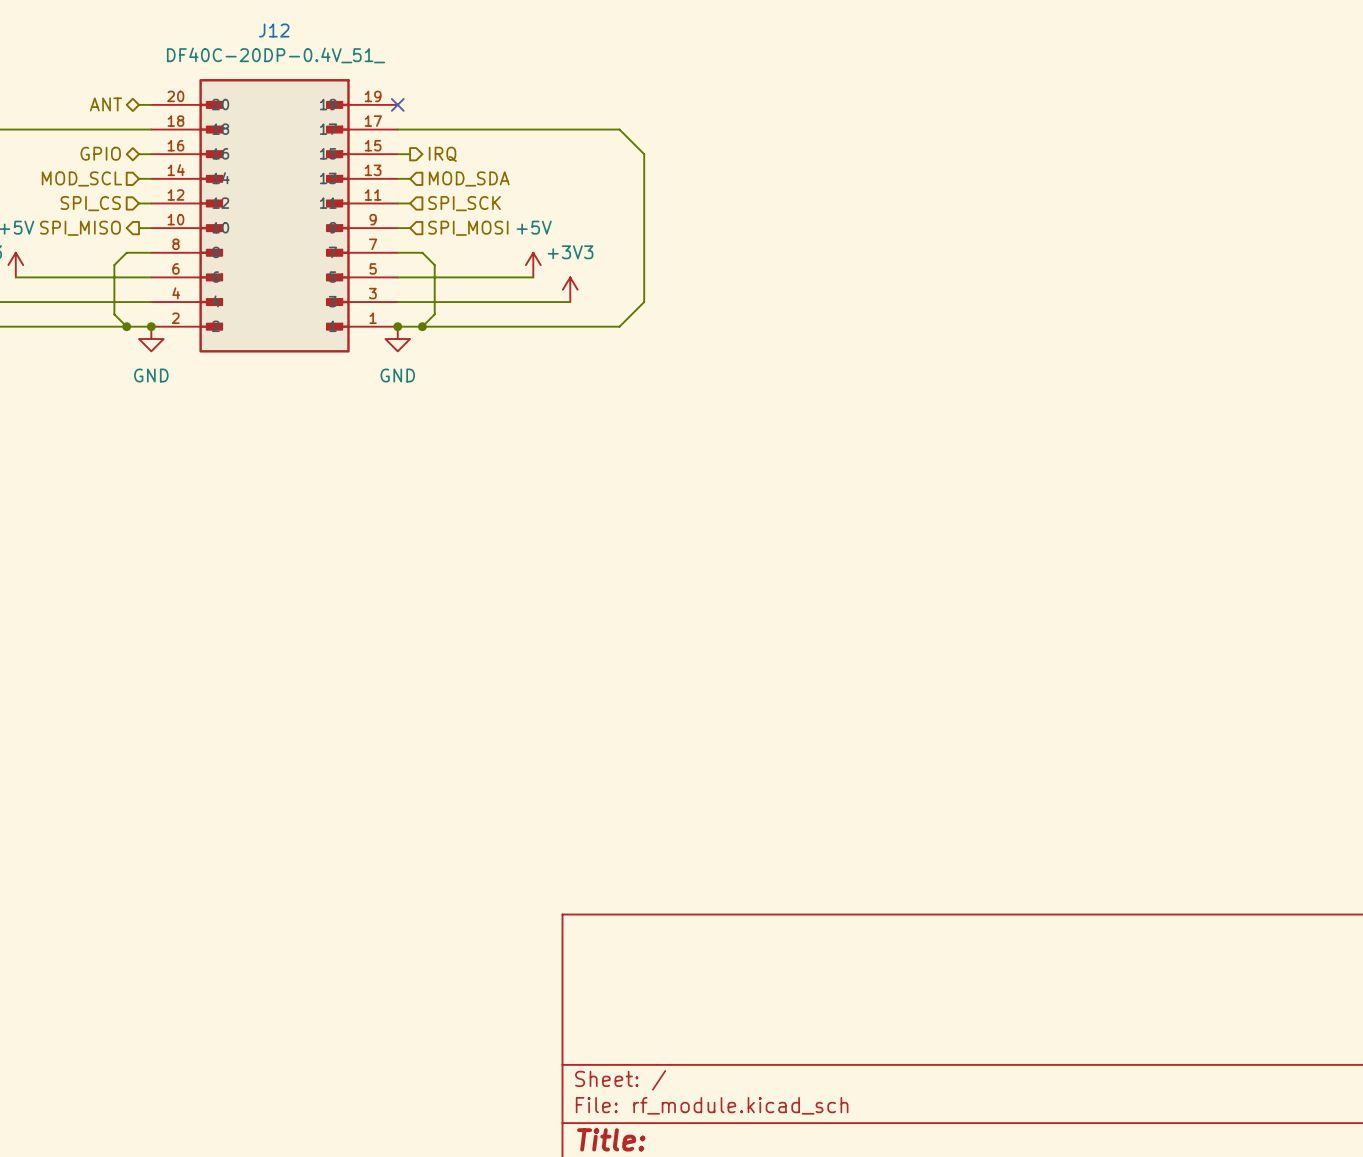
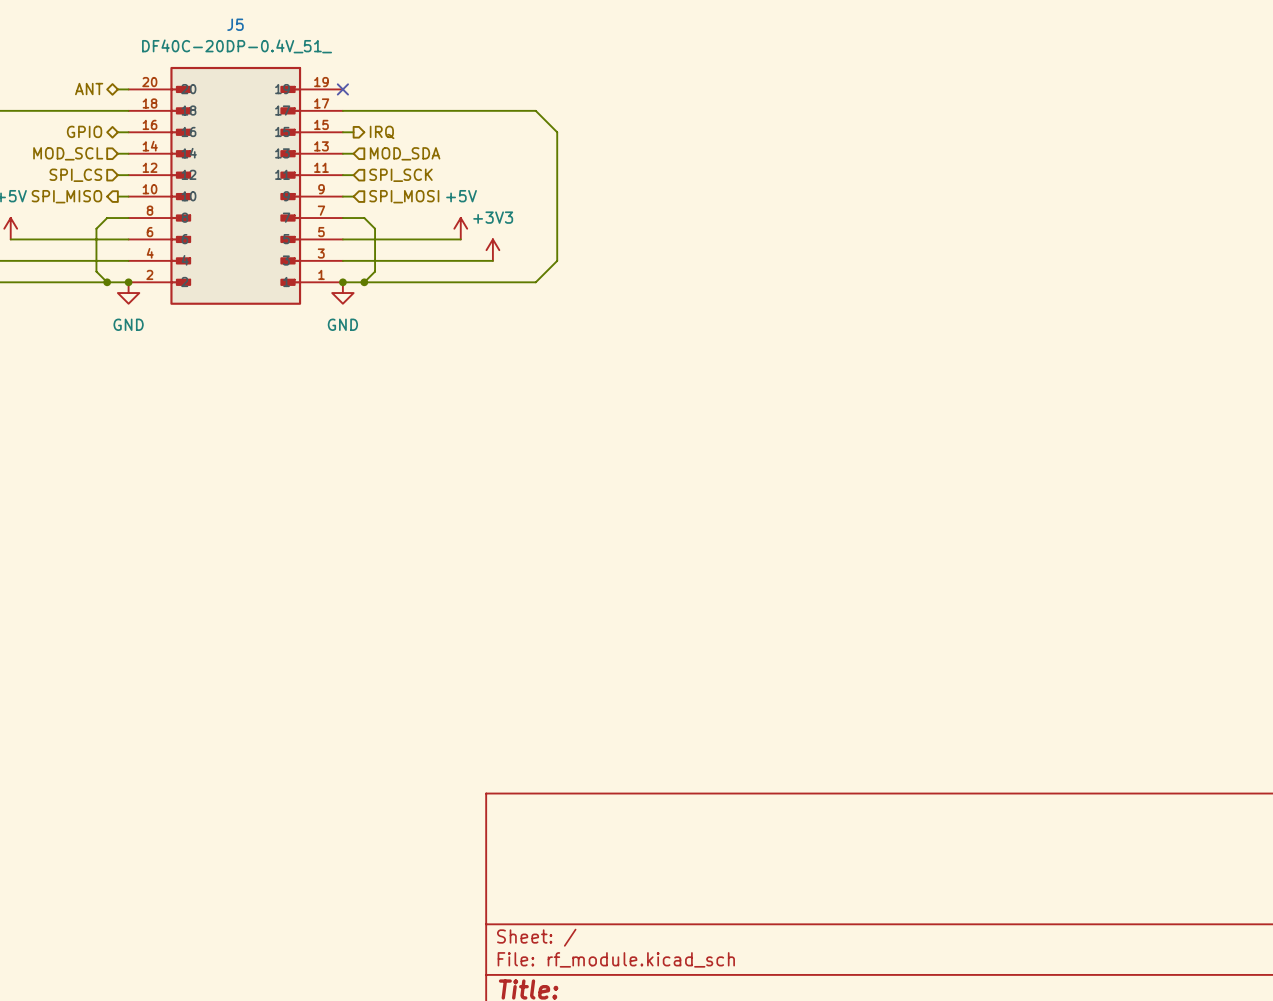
J12 name: J12 (274, 30) -> J5 (235, 24)

